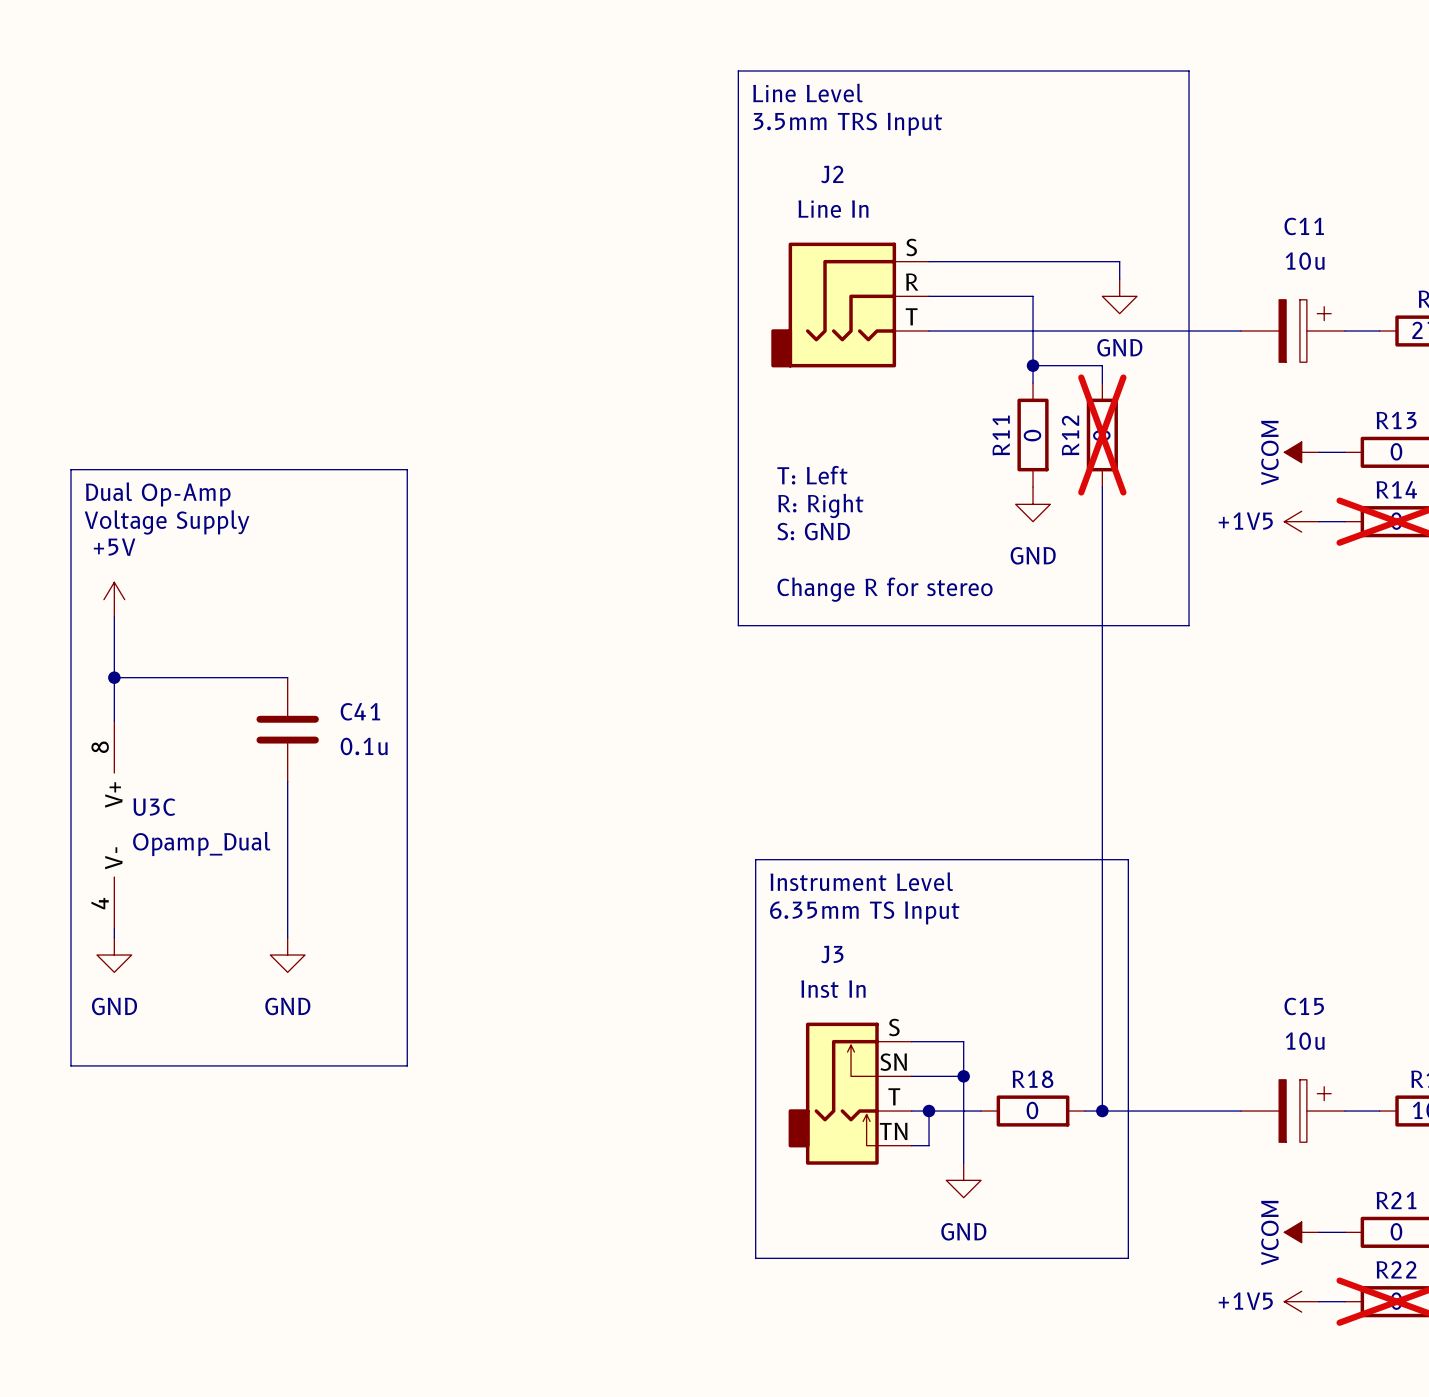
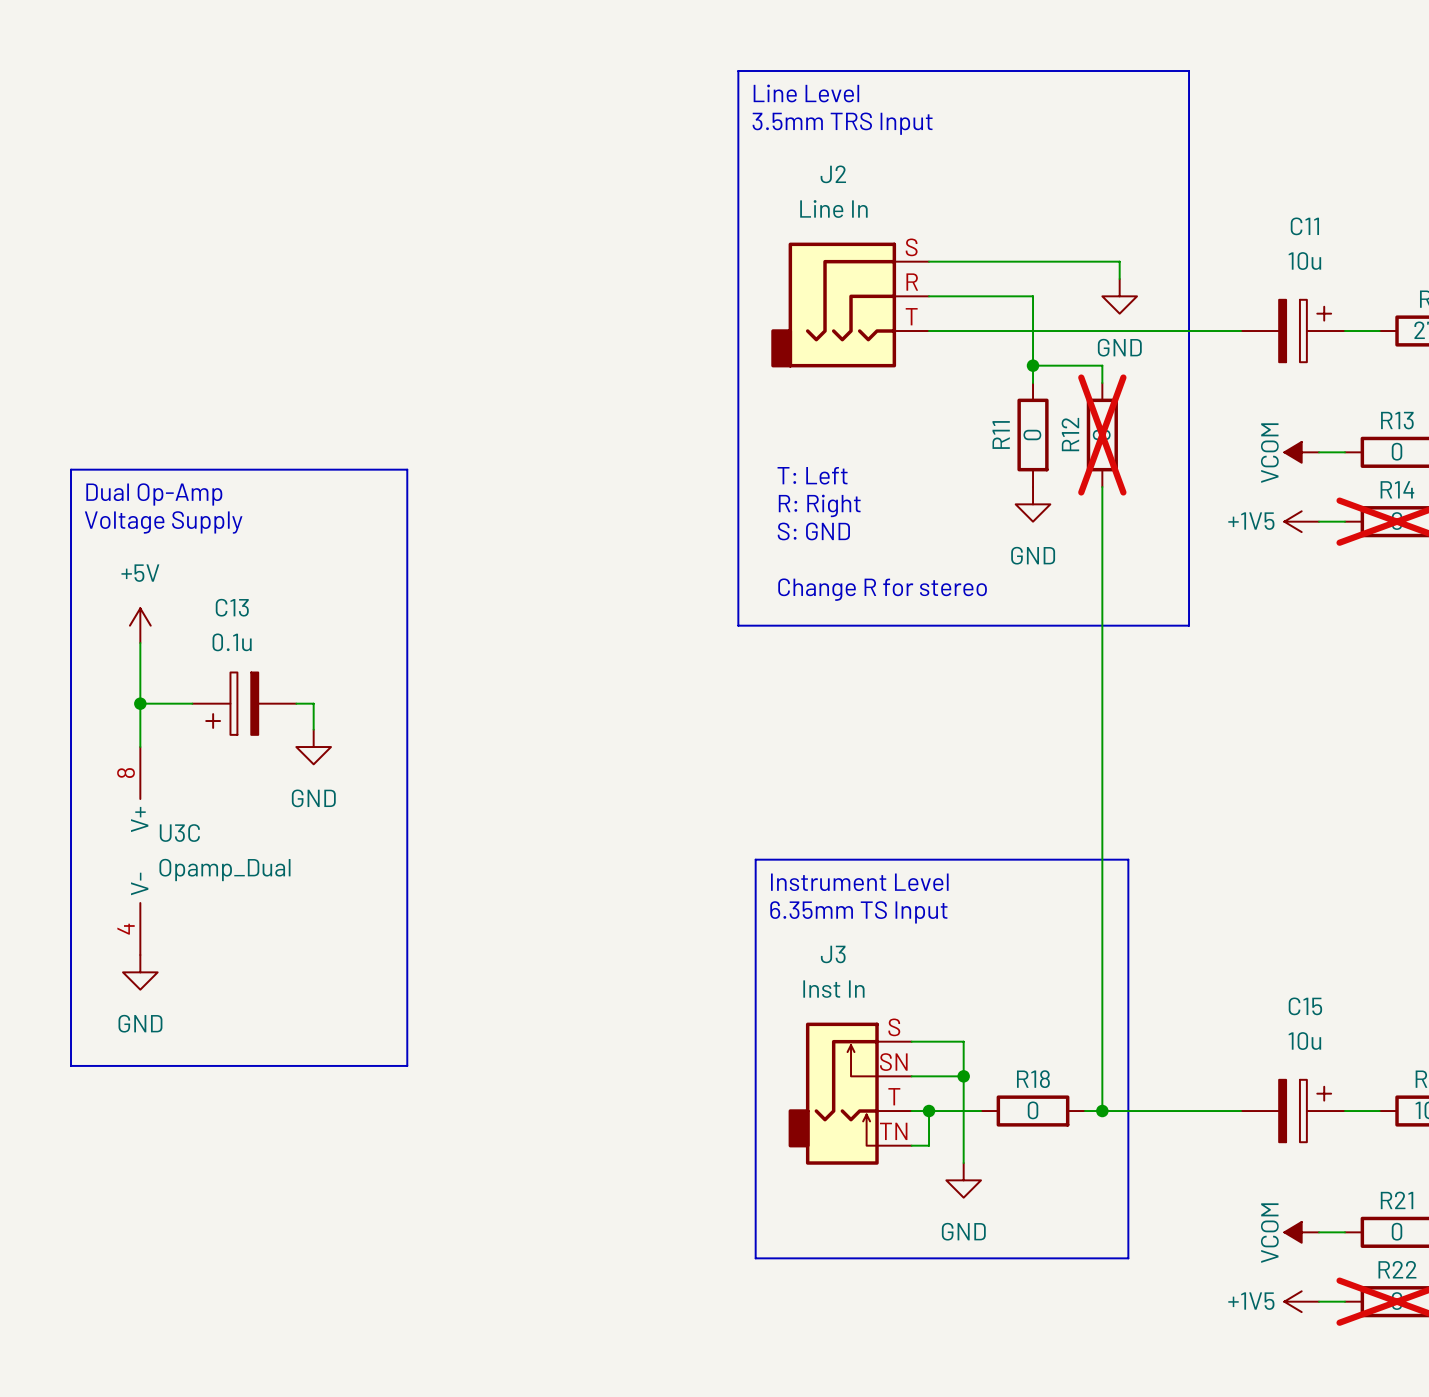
power symbol position: +5V (114, 599) -> +5V (140, 625)
wire: (114, 617) (114, 721) -> (140, 643) (140, 747)
wire: (114, 677) (287, 677) -> none
junction position: (114, 677) -> (140, 703)
wire: none -> (140, 703) (192, 703)
C13: none -> 0.1u (244, 703)
wire: none -> (296, 703) (313, 703) (313, 729)
C41: 0.1u (287, 729) -> none
power symbol: none -> GND (313, 747)
wire: (287, 781) (287, 937) -> none
U3C position: (114, 825) -> (140, 851)
wire: (114, 929) (114, 937) -> none
power symbol position: GND (114, 955) -> GND (140, 972)
power symbol: GND (287, 955) -> none

